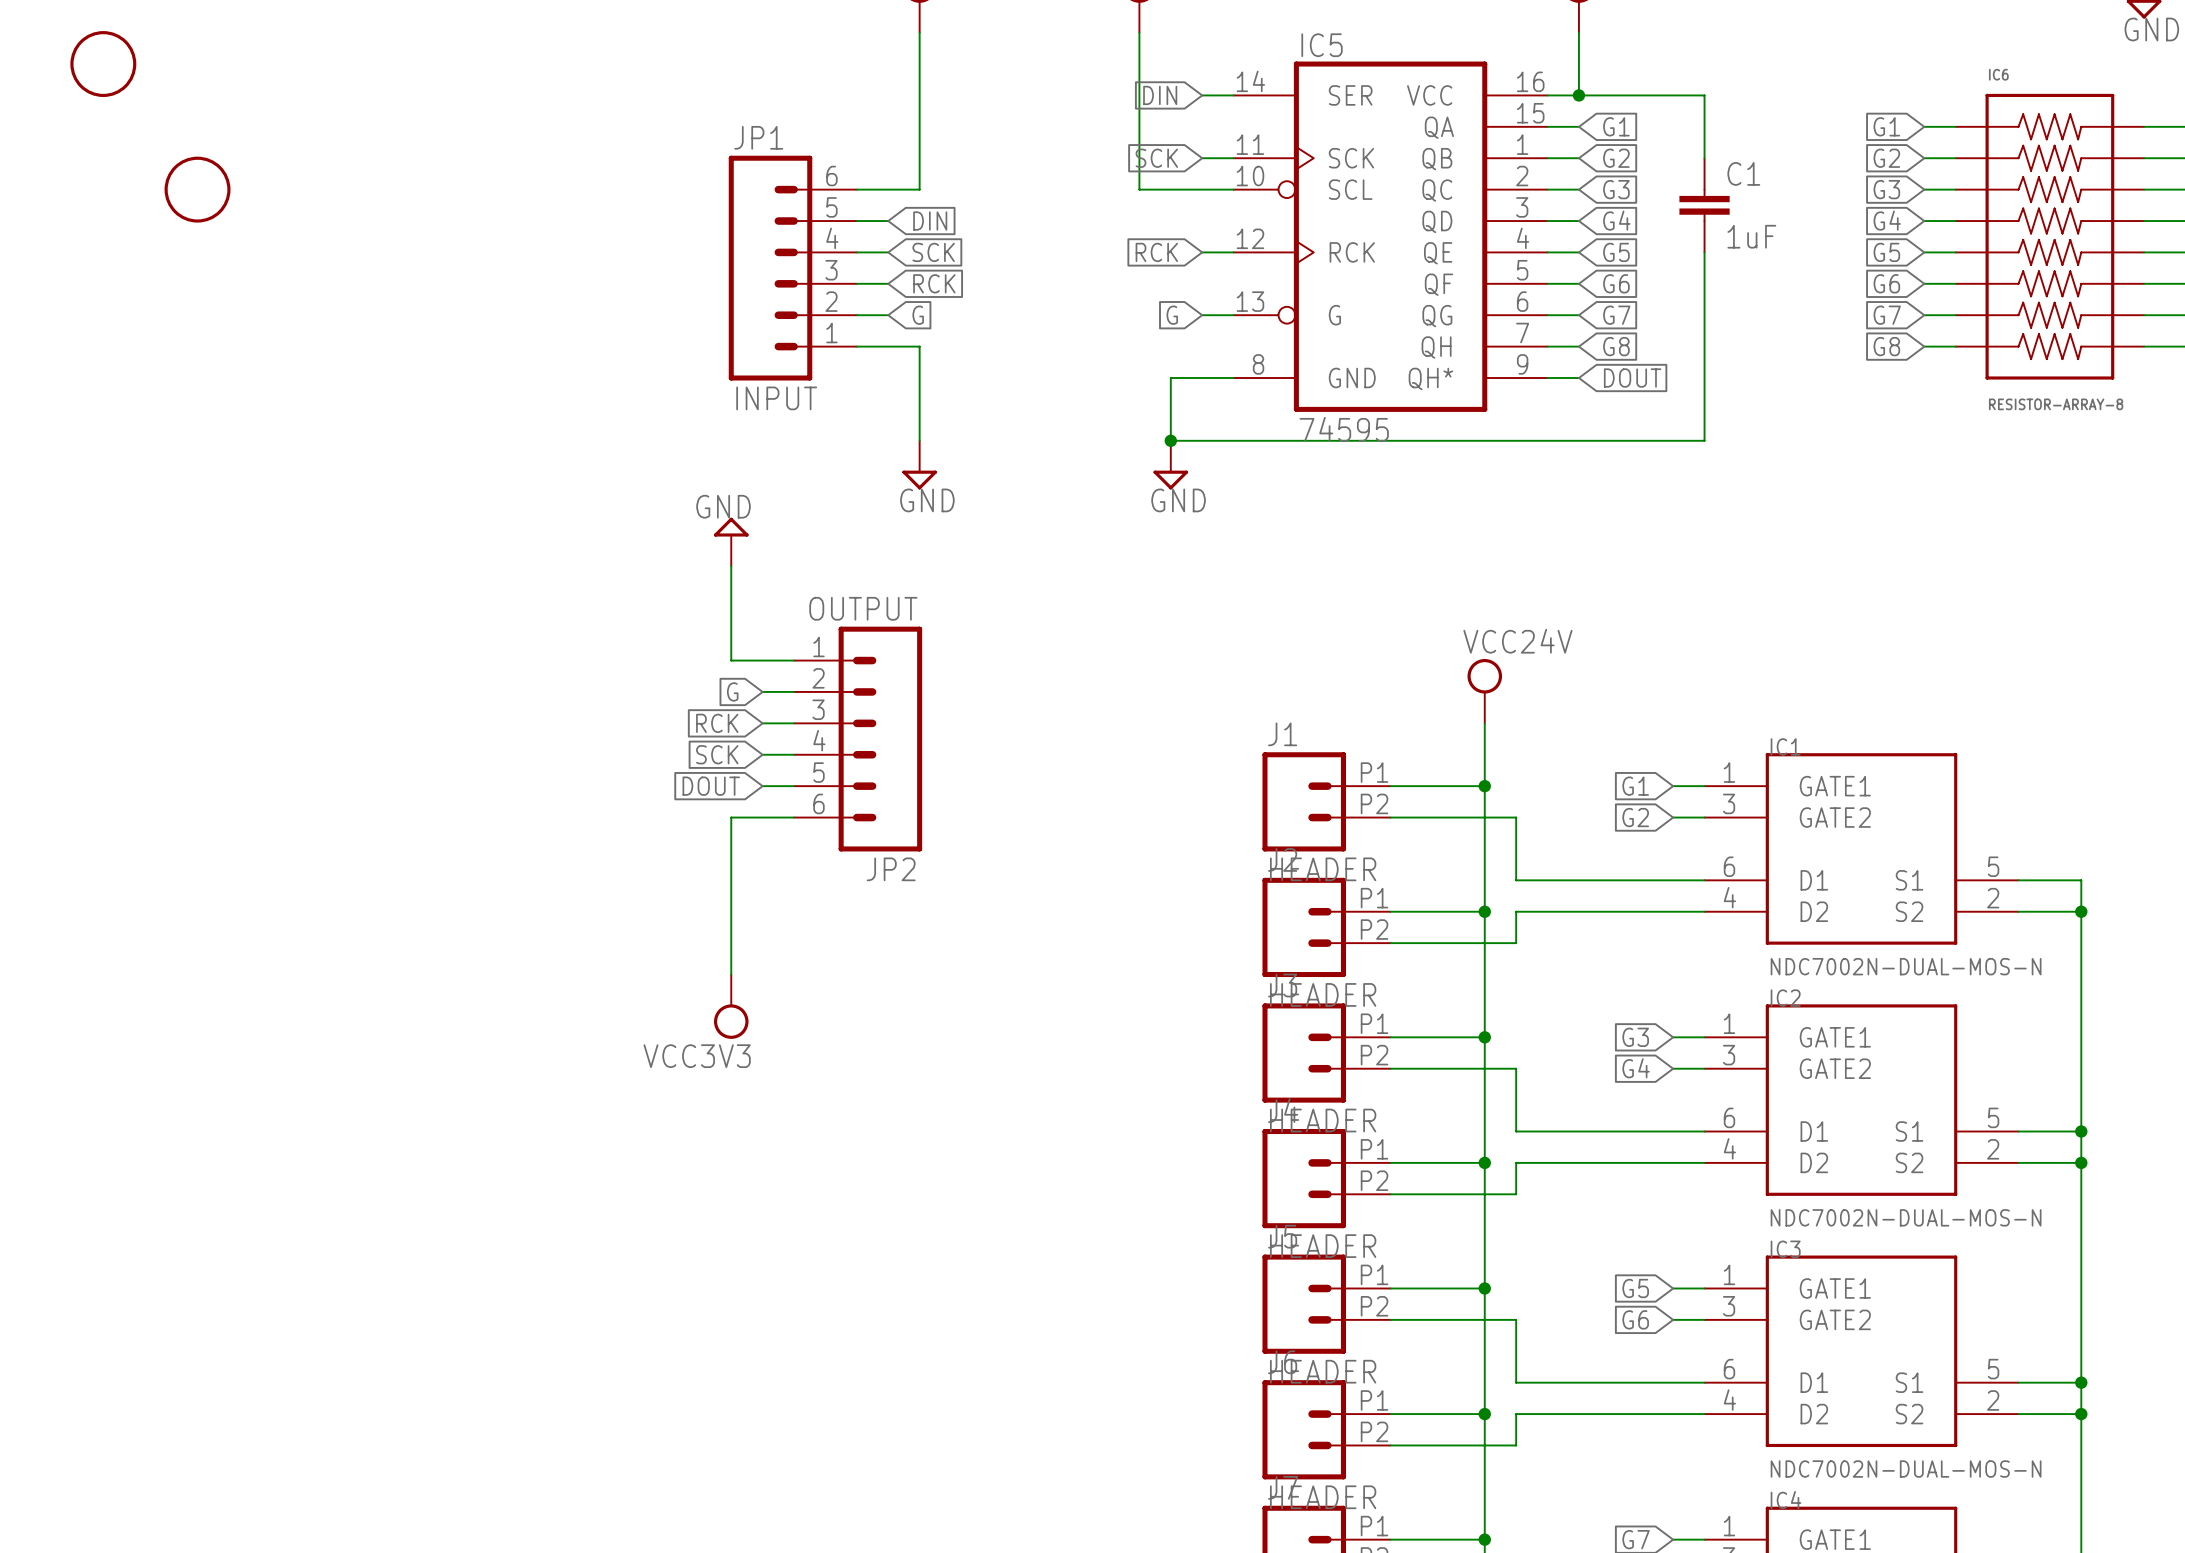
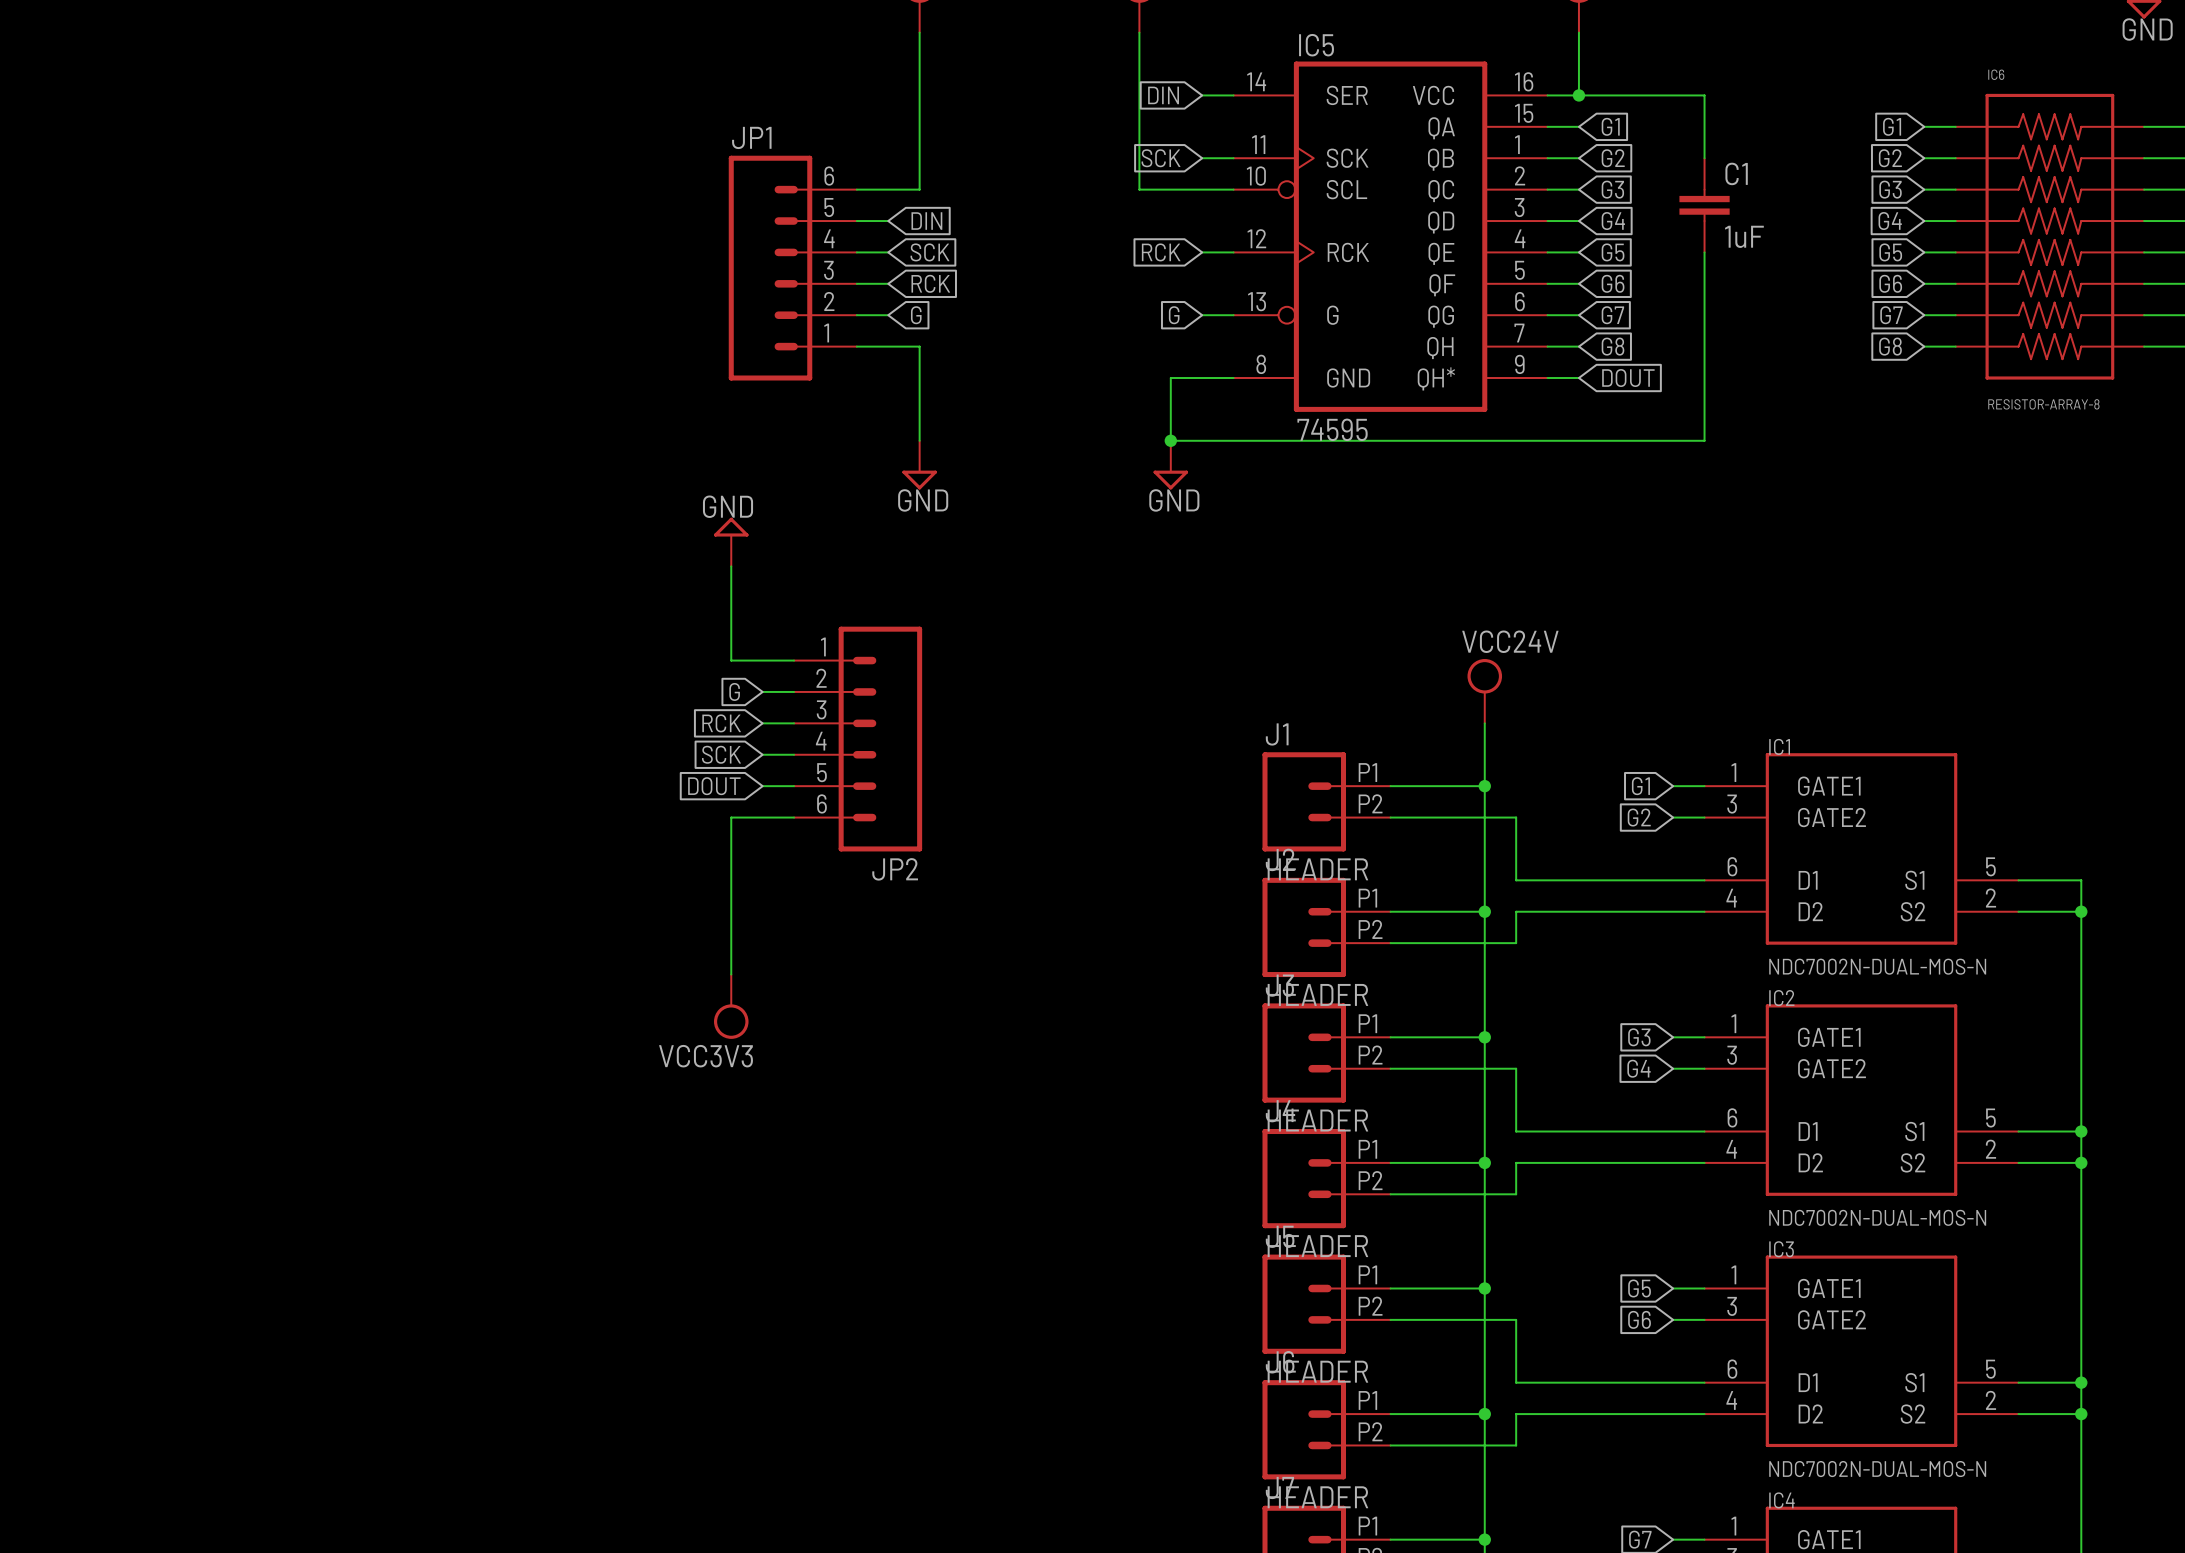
part: (103, 64) -> none
part: (197, 189) -> none
JP1 value: INPUT (776, 398) -> none
JP2 value: OUTPUT (863, 608) -> none

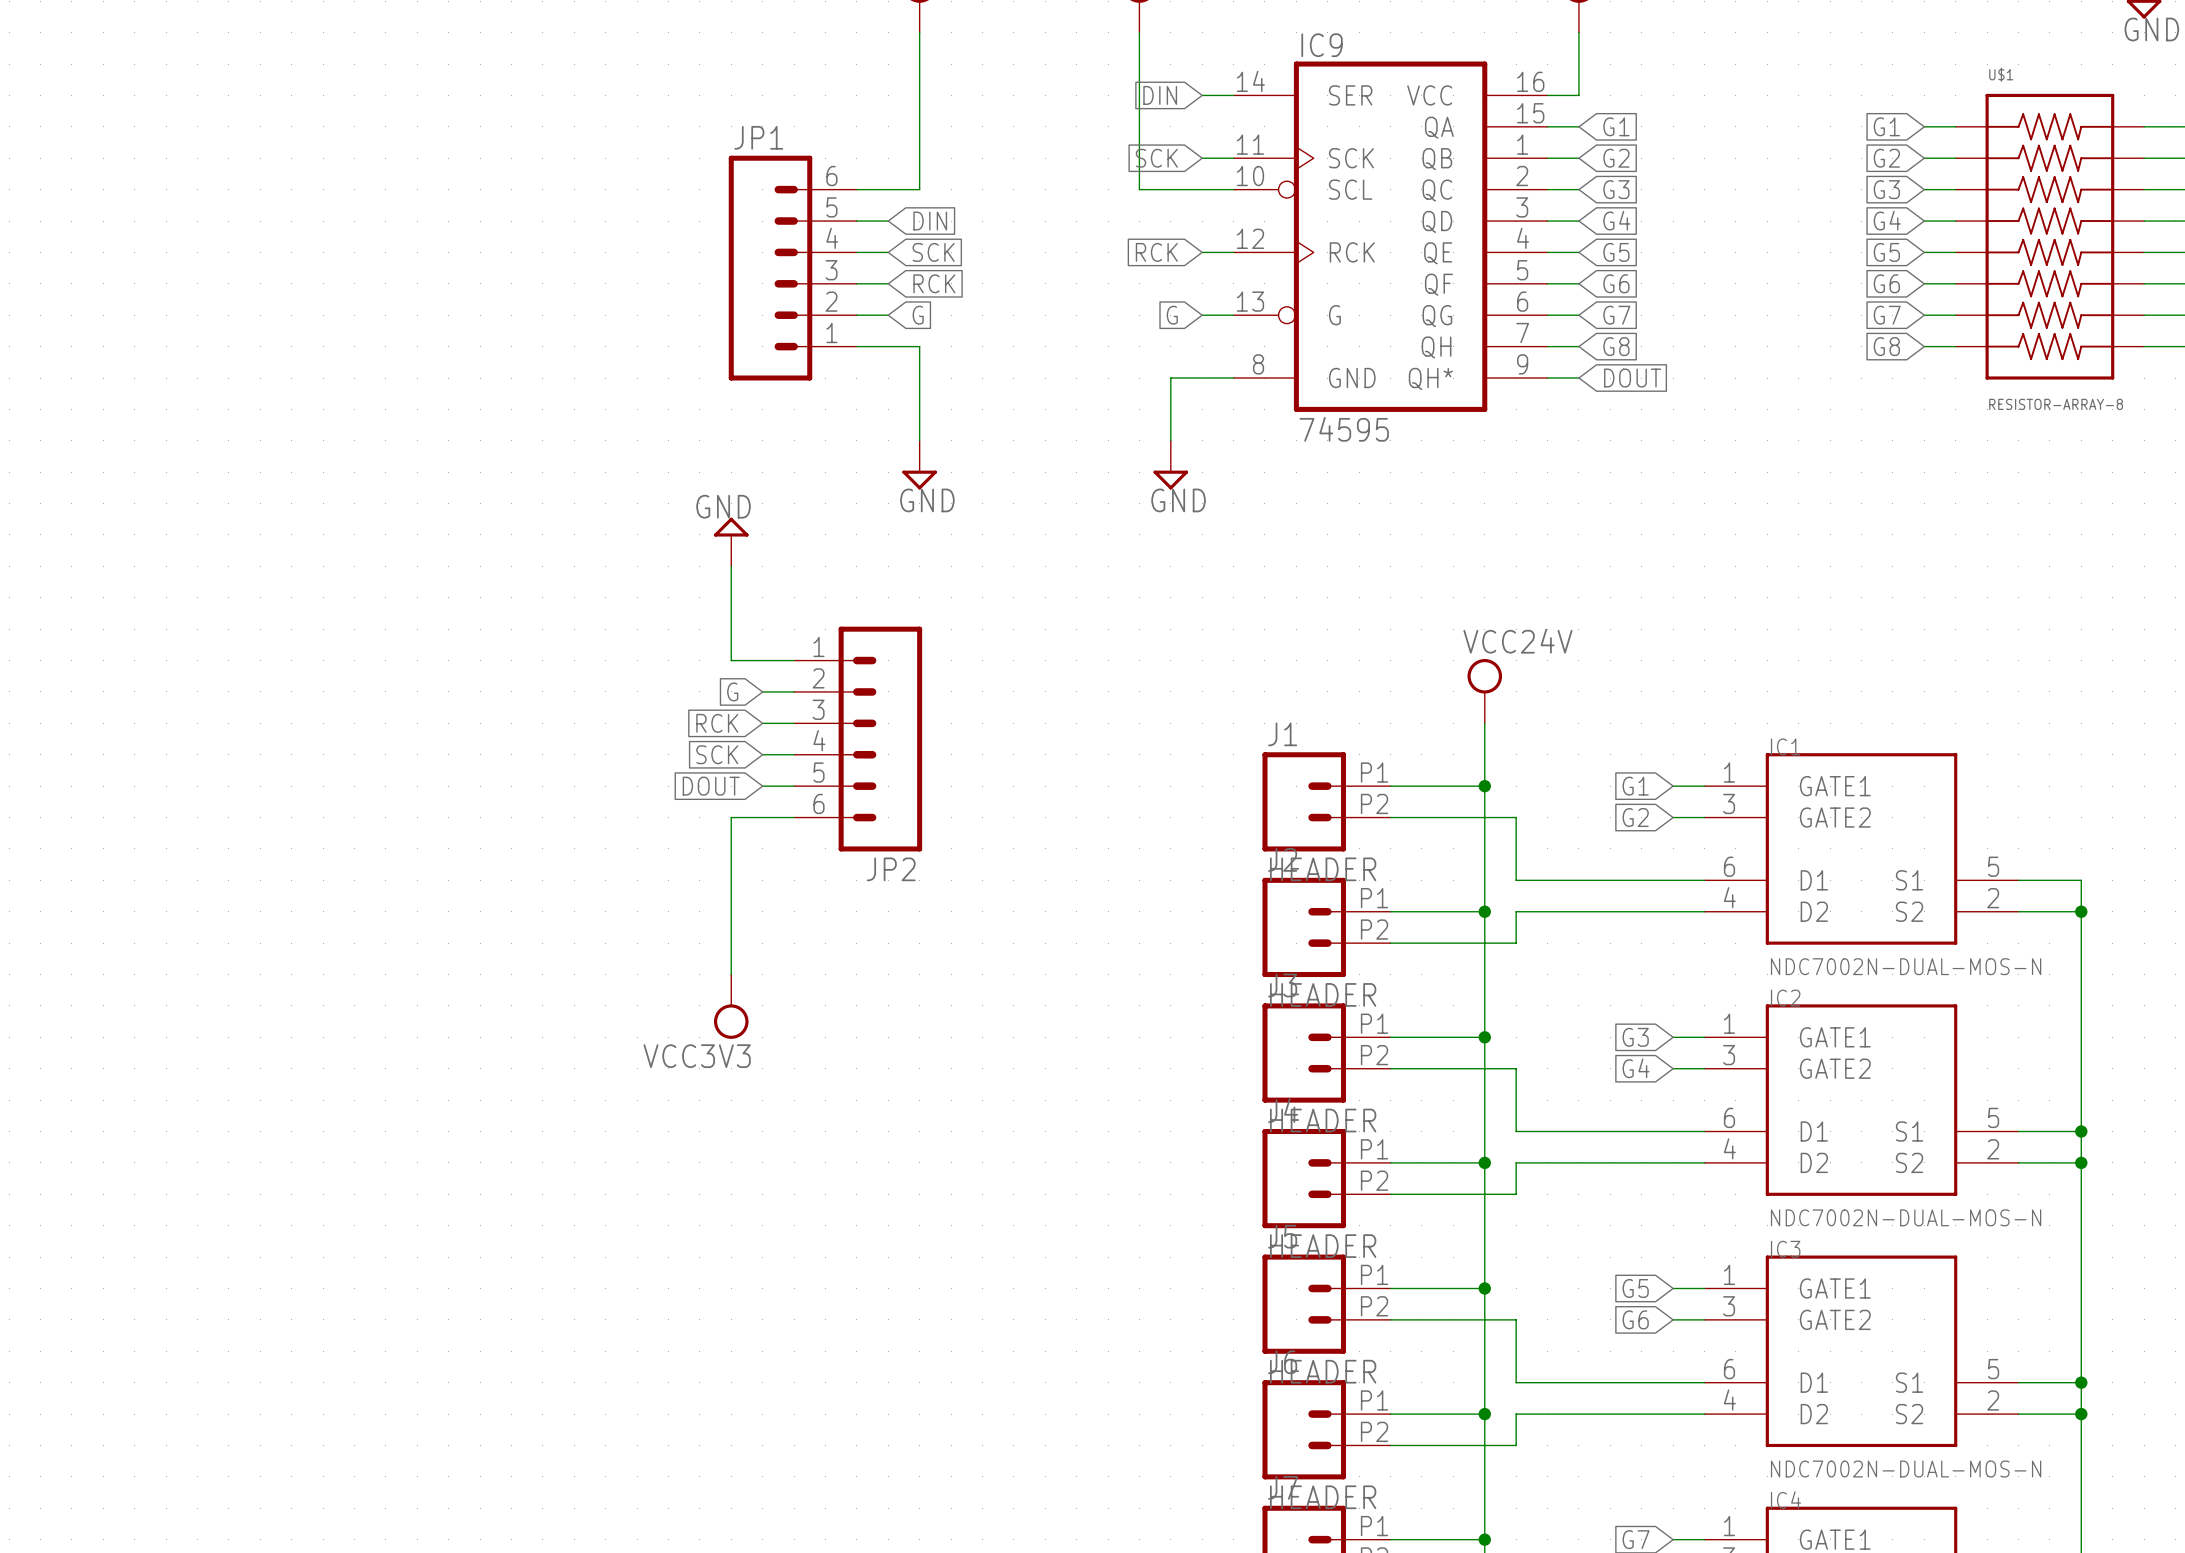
IC5 name: IC5 (1316, 45) -> IC9 (1322, 45)
IC6 name: IC6 (1996, 74) -> U$1 (2001, 74)
wire: (1578, 95) (1704, 95) (1704, 158) -> none
junction: (1578, 95) -> none
C1: 1uF (1704, 205) -> none
wire: (1704, 252) (1704, 440) (1170, 440) -> none
junction: (1170, 440) -> none

